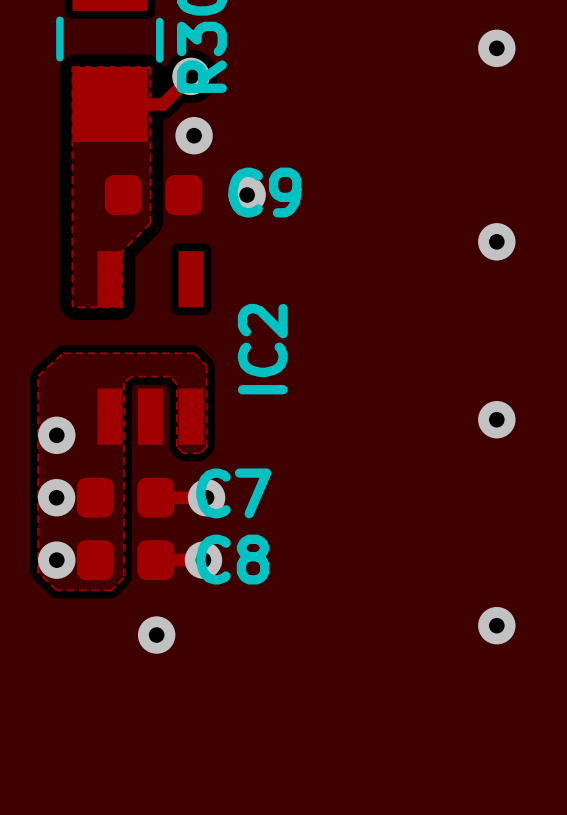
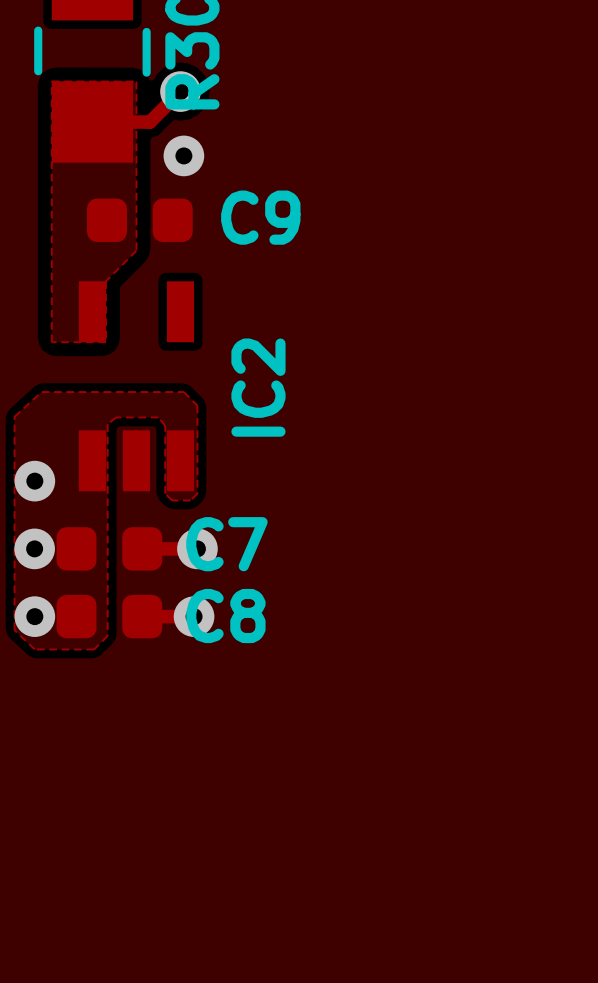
via: (496, 48) -> none
via: (247, 195) -> none
via: (496, 241) -> none
via: (496, 419) -> none
via: (496, 625) -> none
via: (156, 635) -> none

